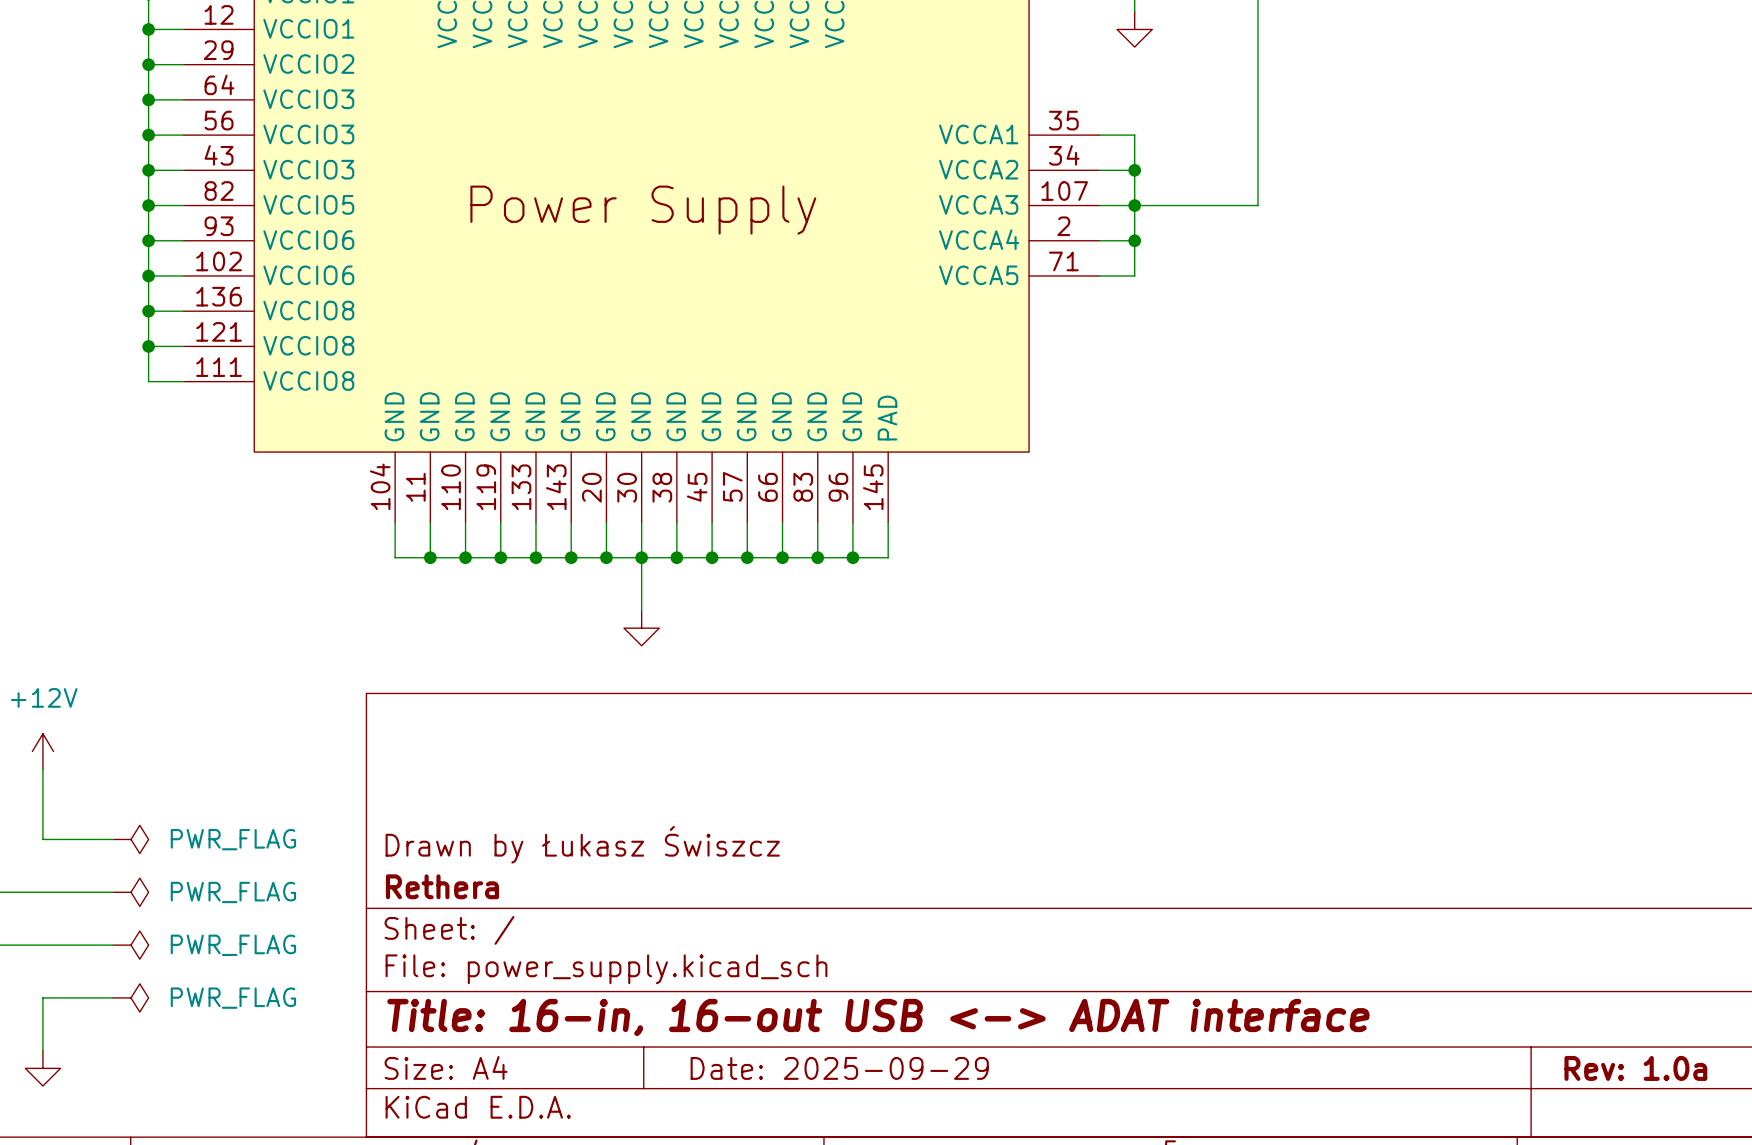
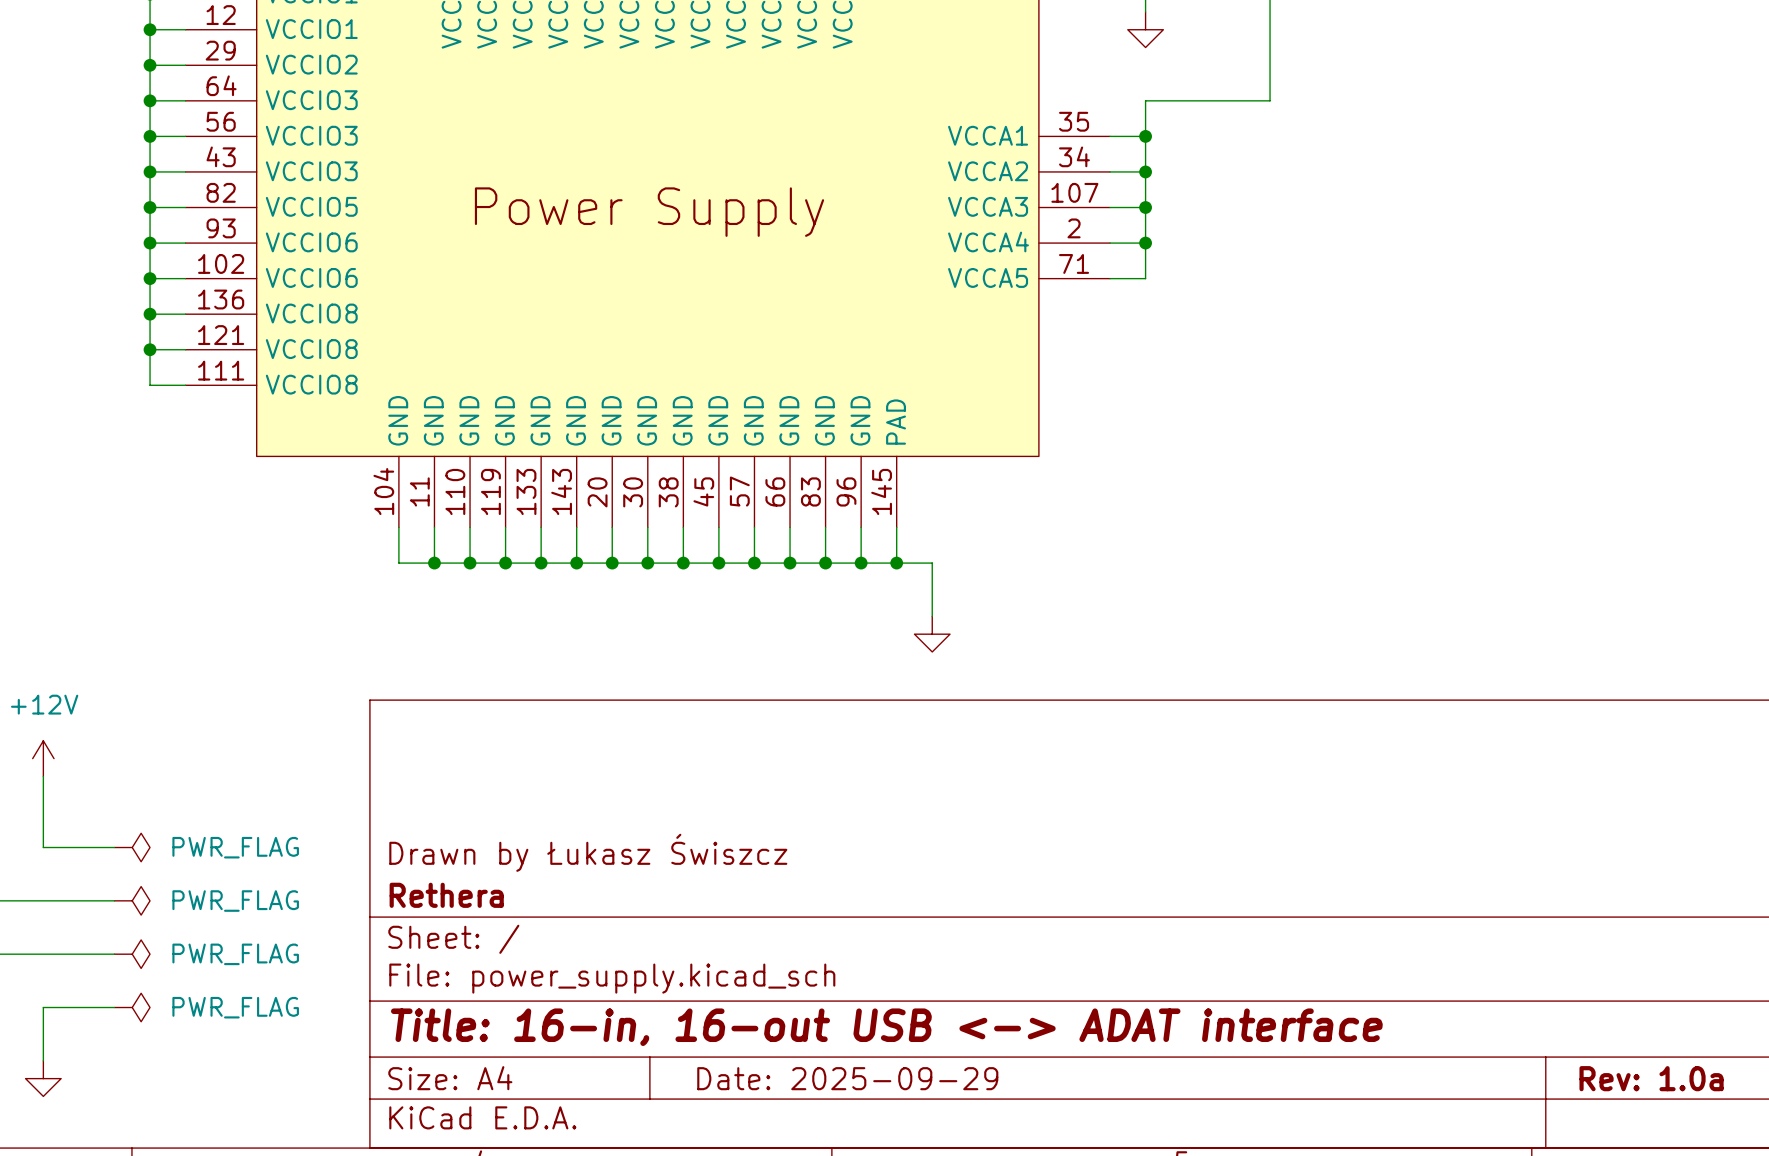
wire: (1257, 99) (1257, 205) (1134, 205) -> (1270, 100) (1145, 100) (1145, 136)
junction: none -> (1145, 136)
wire: (641, 557) (641, 610) -> none
wire: none -> (896, 563) (932, 563) (932, 616)
junction: none -> (896, 563)
power symbol position: (641, 628) -> (932, 634)

